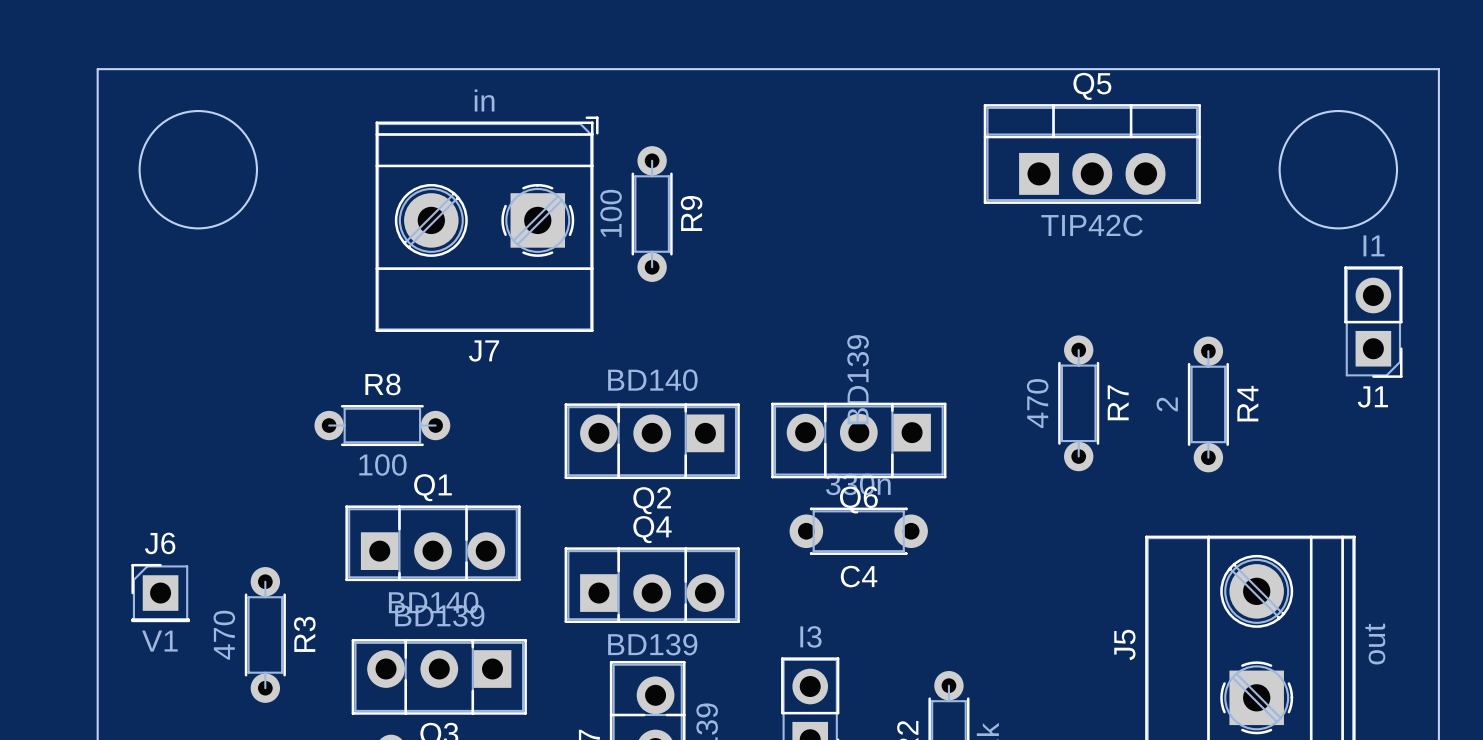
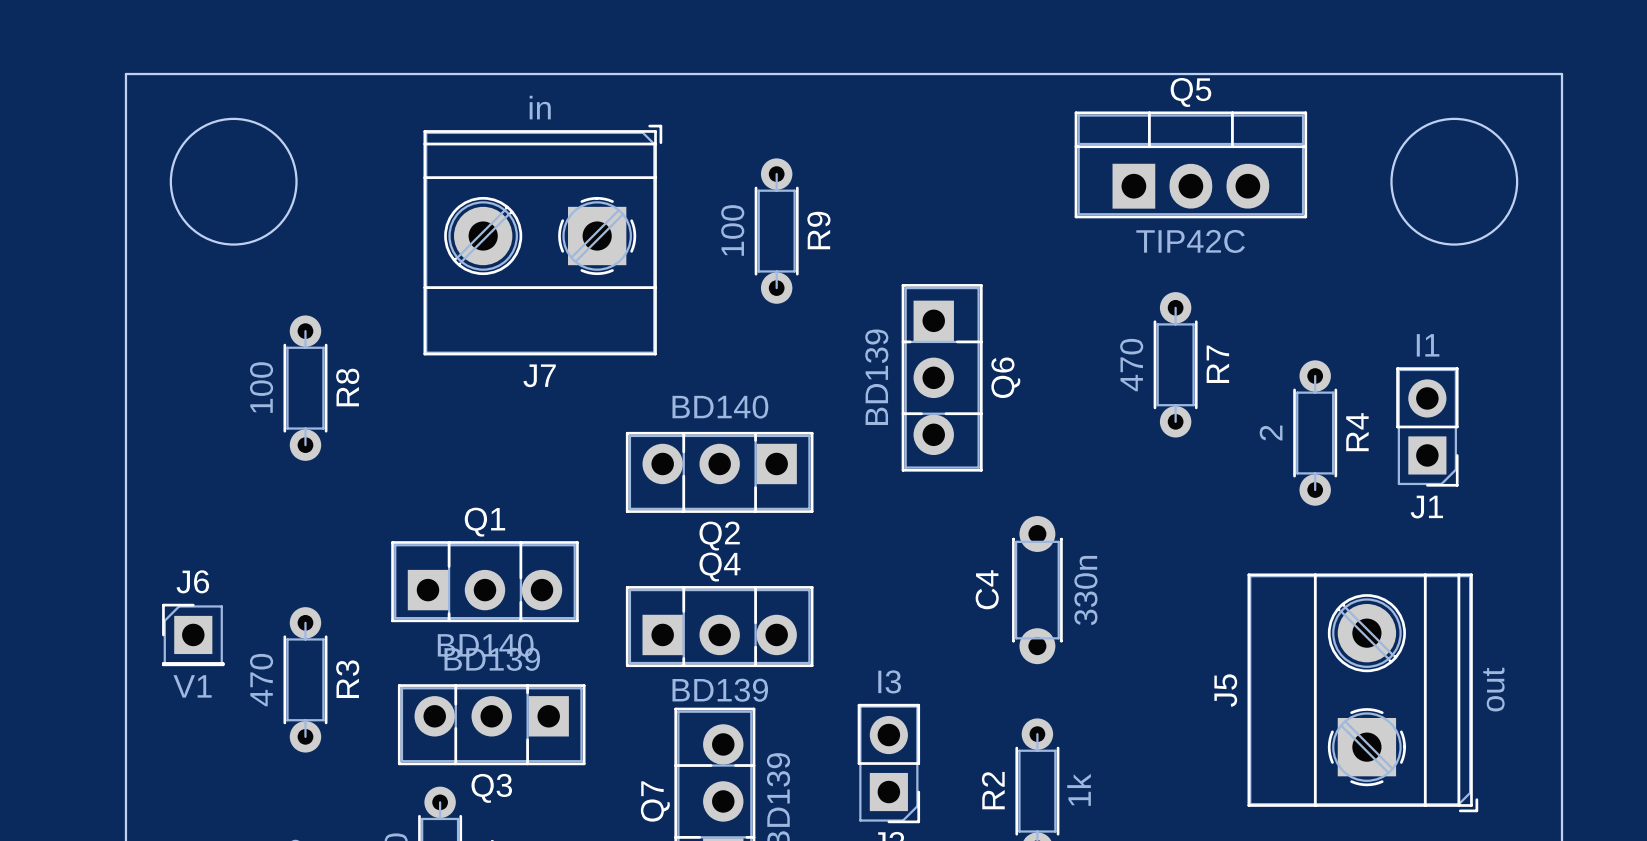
R9 position: (652, 214) -> (776, 231)
J1 position: (1373, 322) -> (1427, 426)
R7 position: (1078, 403) -> (1175, 364)
R8 rotation: 0° (382, 425) -> 90° clockwise (305, 388)
R8 position: (382, 425) -> (305, 388)
Q6 rotation: 0° (858, 440) -> 90° counterclockwise (942, 377)
C4 rotation: 0° (858, 531) -> 90° clockwise (1037, 590)
C4 position: (858, 531) -> (1037, 590)

